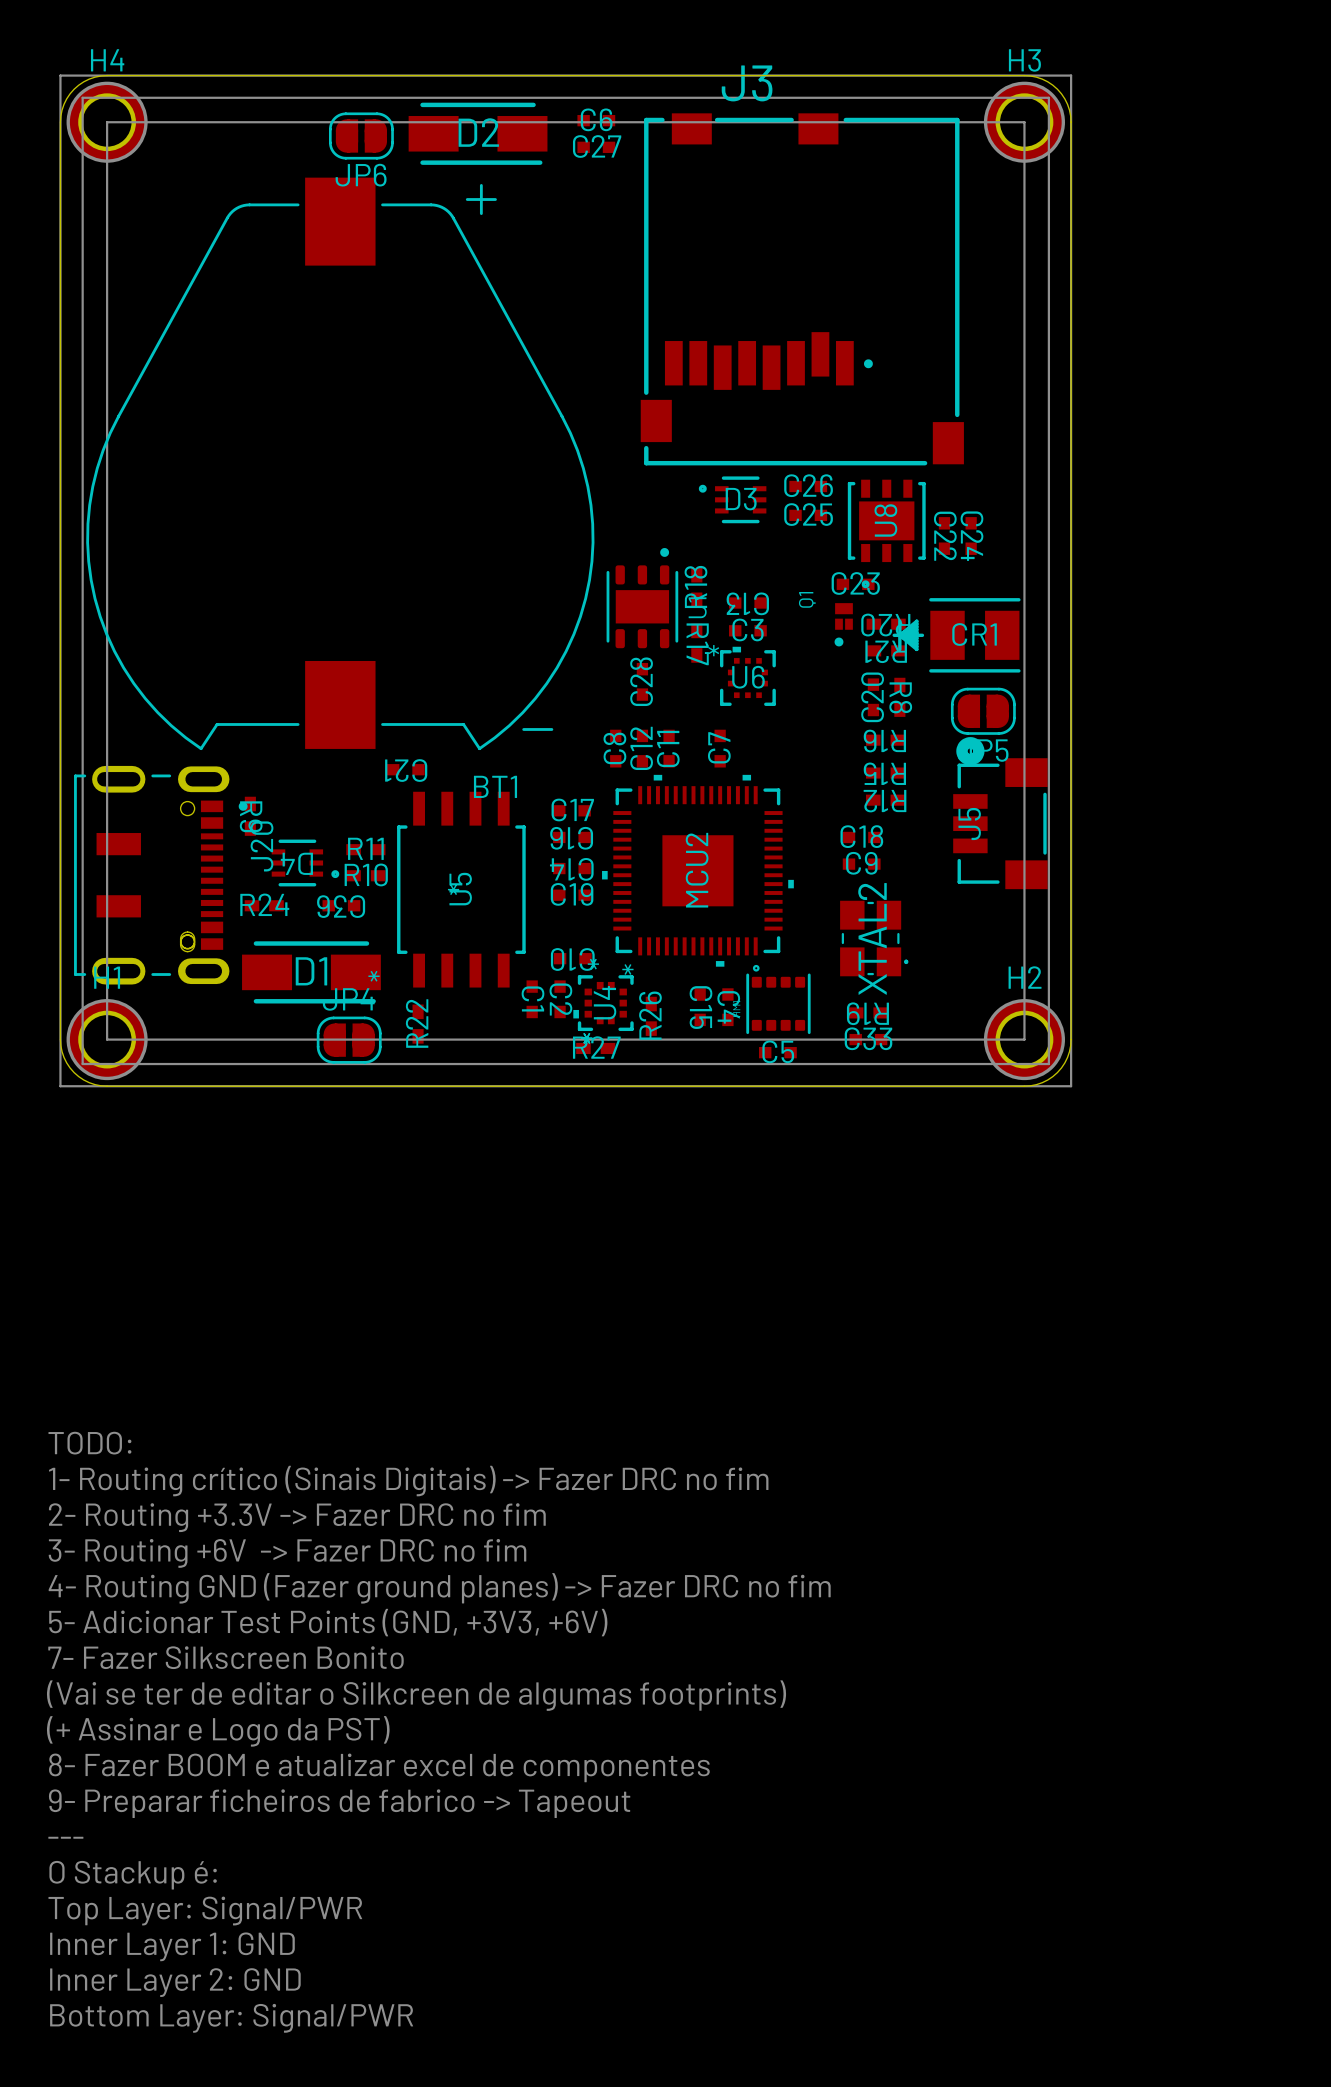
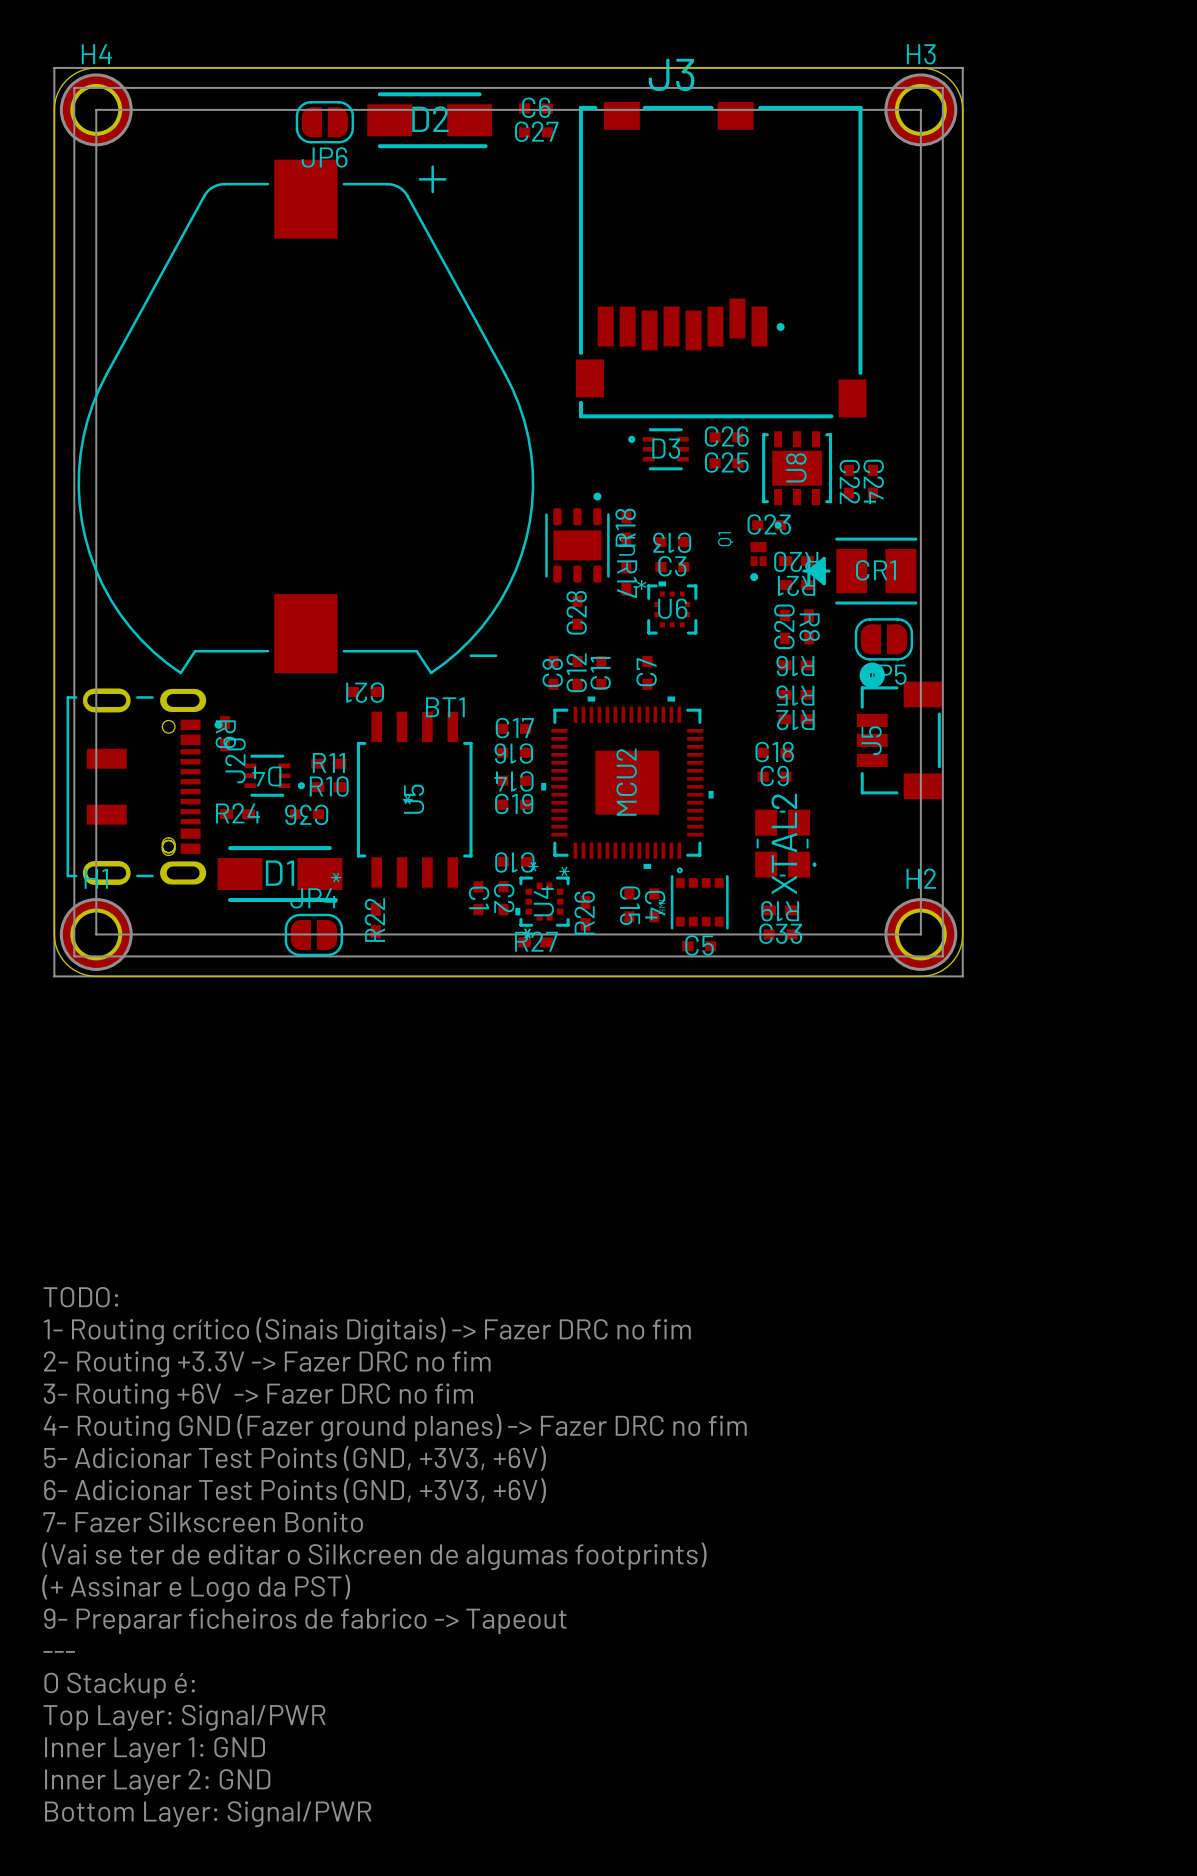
text: 7- Fazer Silkscreen Bonito (226, 1657) -> 6- Adicionar Test Points (GND, +3V3, +6V) (295, 1490)
text: (Vai se ter de editar o Silkcreen de algumas footprints) (416, 1695) -> 7- Fazer Silkscreen Bonito (203, 1522)
text: (+ Assinar e Logo da PST) (218, 1731) -> (Vai se ter de editar o Silkcreen de algumas footprints) (374, 1556)
text: 8- Fazer BOOM e atualizar excel de componentes (379, 1767) -> (+ Assinar e Logo da PST) (196, 1588)

